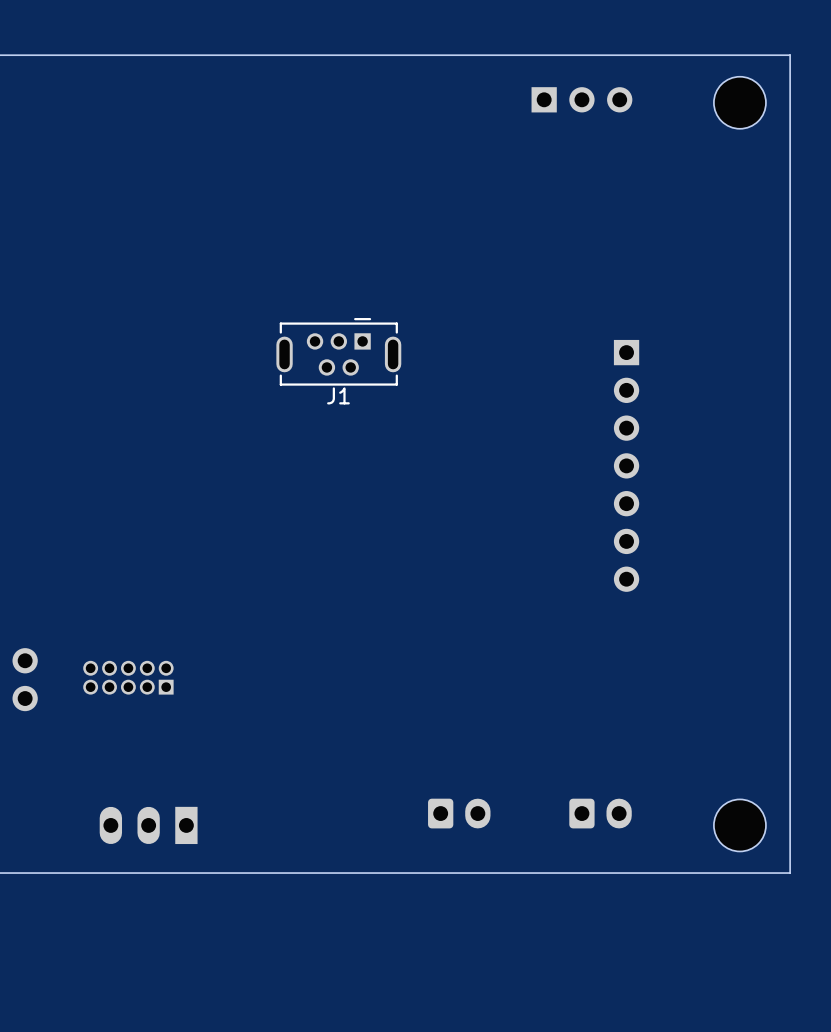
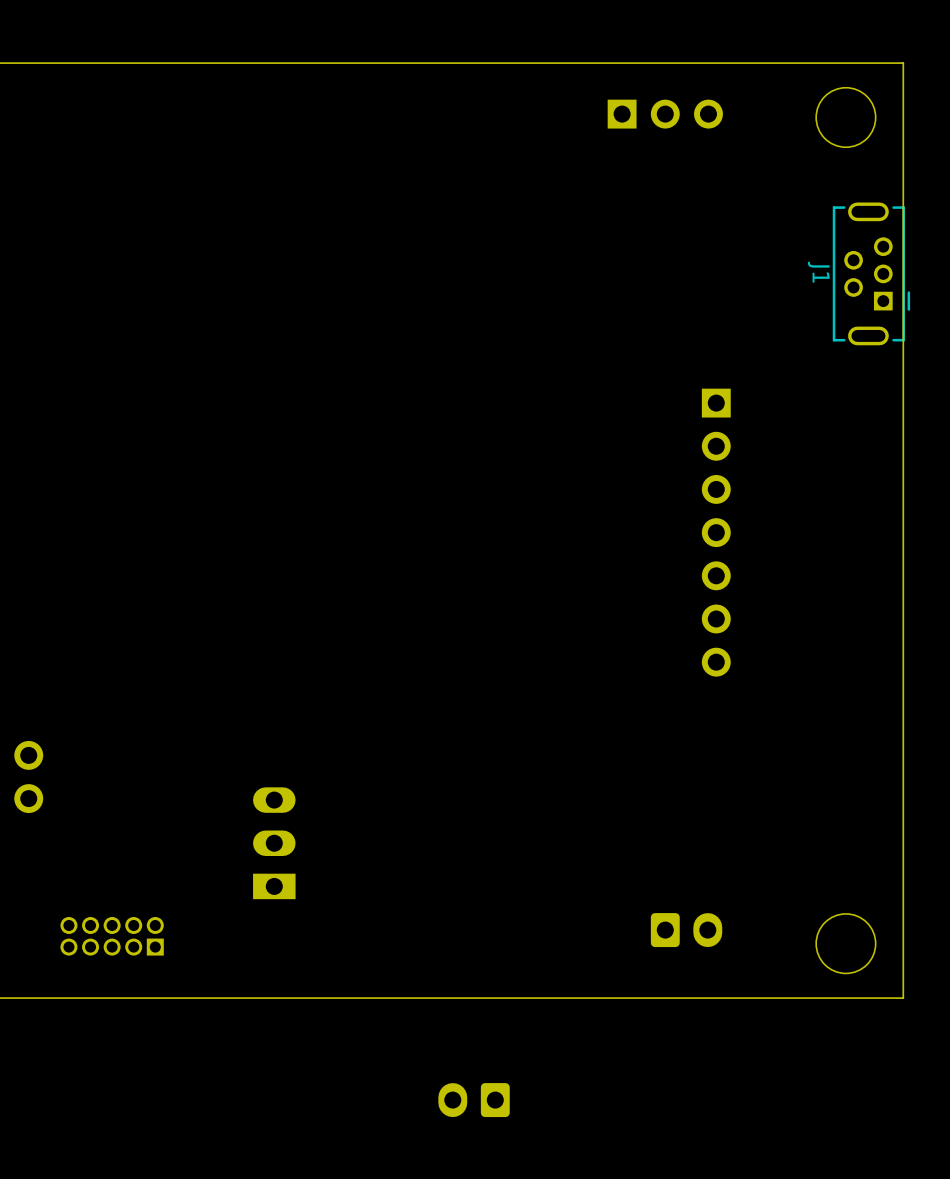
J1 rotation: 0° (338, 351) -> 90° clockwise (871, 273)
J1 position: (338, 351) -> (871, 273)
part position: (128, 677) -> (112, 936)
part rotation: 0° (459, 813) -> 180° (474, 1100)
part position: (459, 813) -> (474, 1100)
part rotation: 0° (148, 825) -> 90° clockwise (274, 843)
part position: (148, 825) -> (274, 843)

